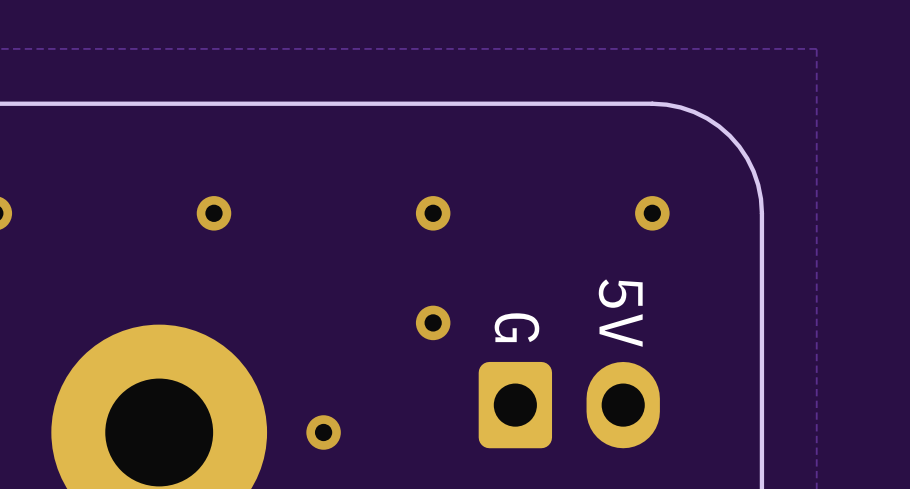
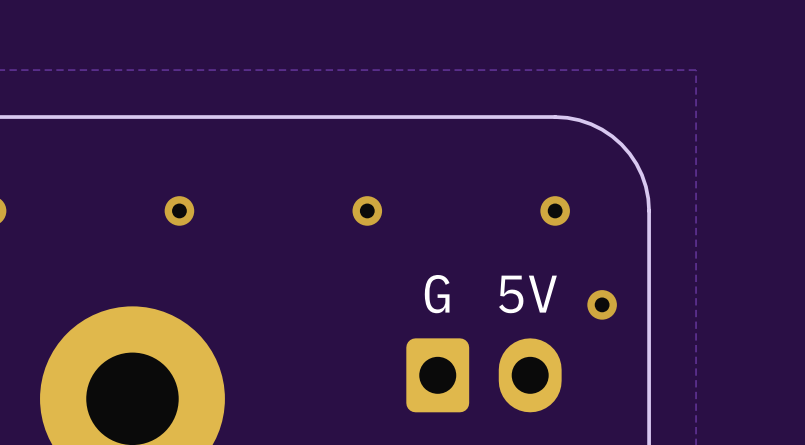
text rotation: 0° (620, 313) -> 90° counterclockwise (527, 294)
via: (433, 322) -> none
via: none -> (602, 304)
text rotation: 0° (516, 327) -> 90° counterclockwise (437, 294)
via: (323, 432) -> none

